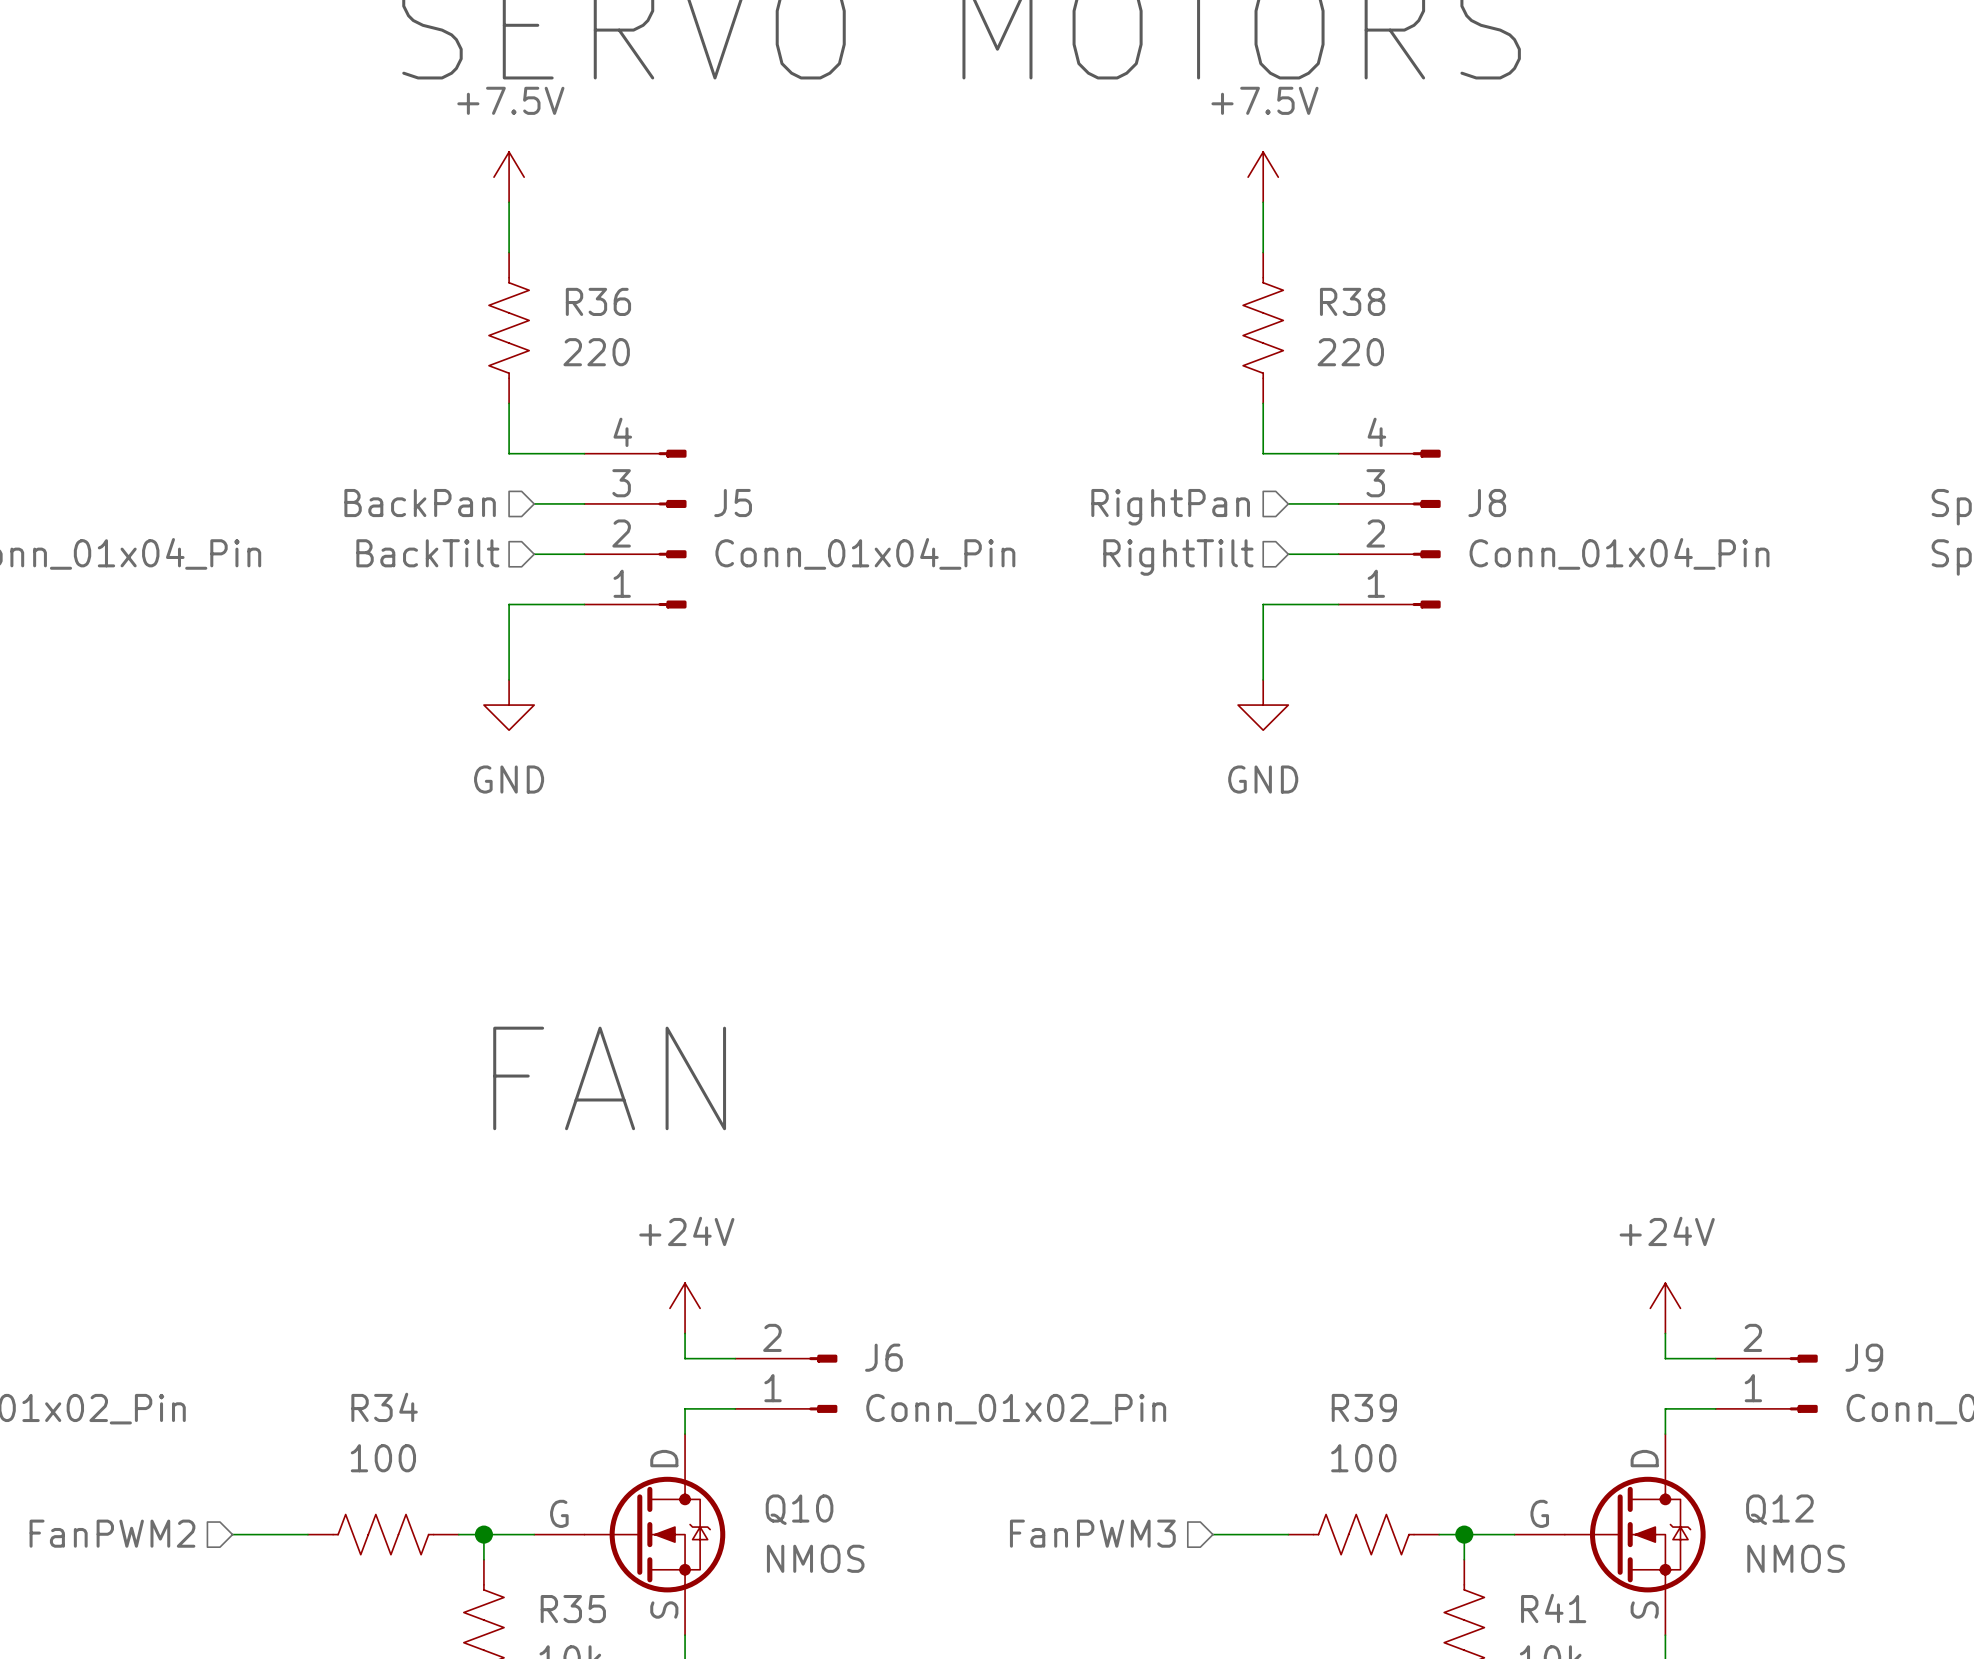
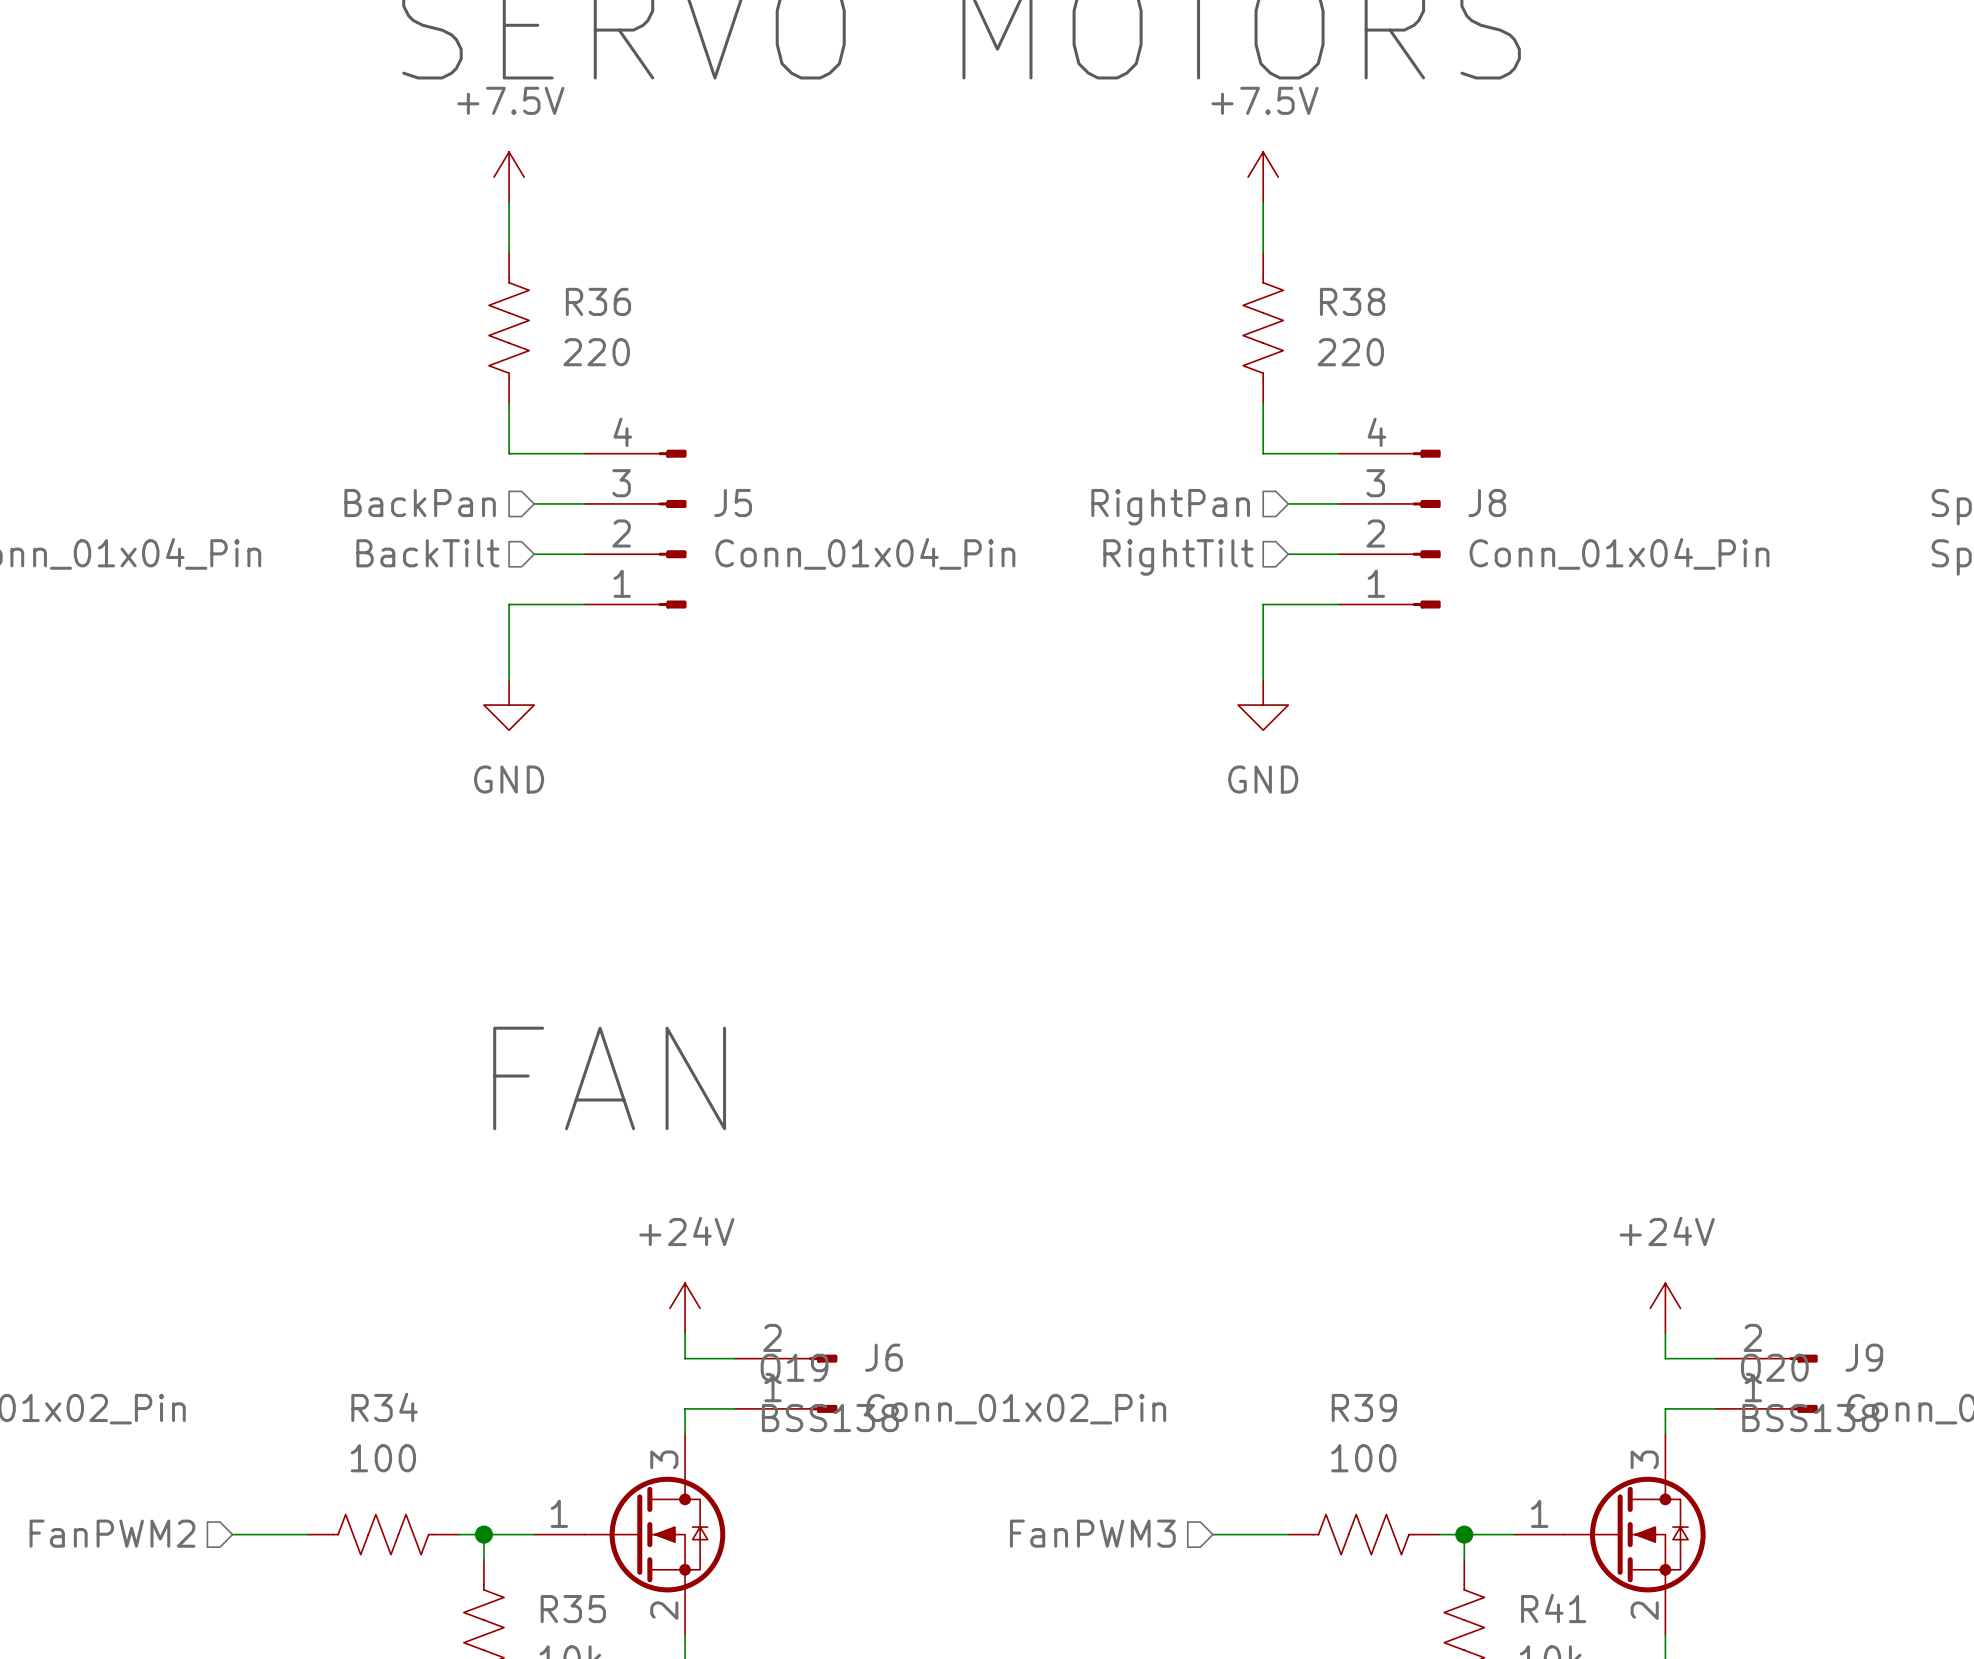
Q10: NMOS (629, 1534) -> none
Q19: none -> BSS138 (629, 1534)
Q12: NMOS (1610, 1534) -> none
Q20: none -> BSS138 (1610, 1534)

